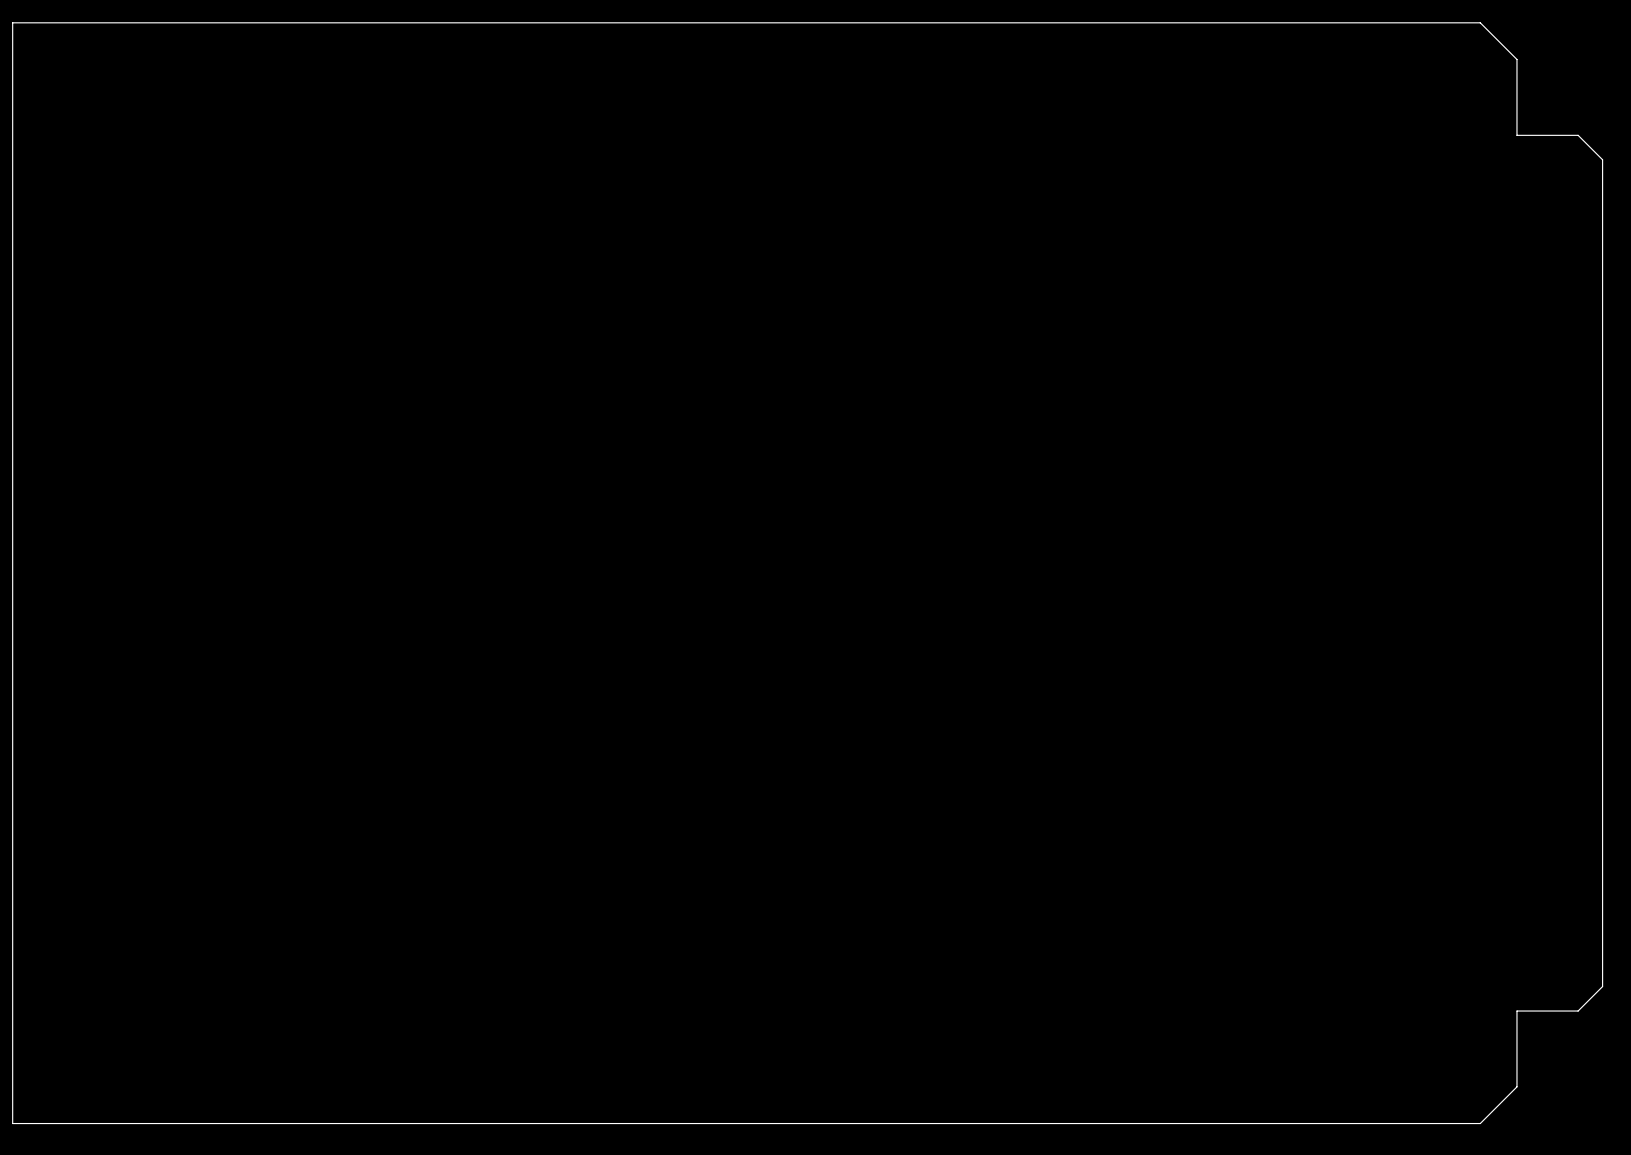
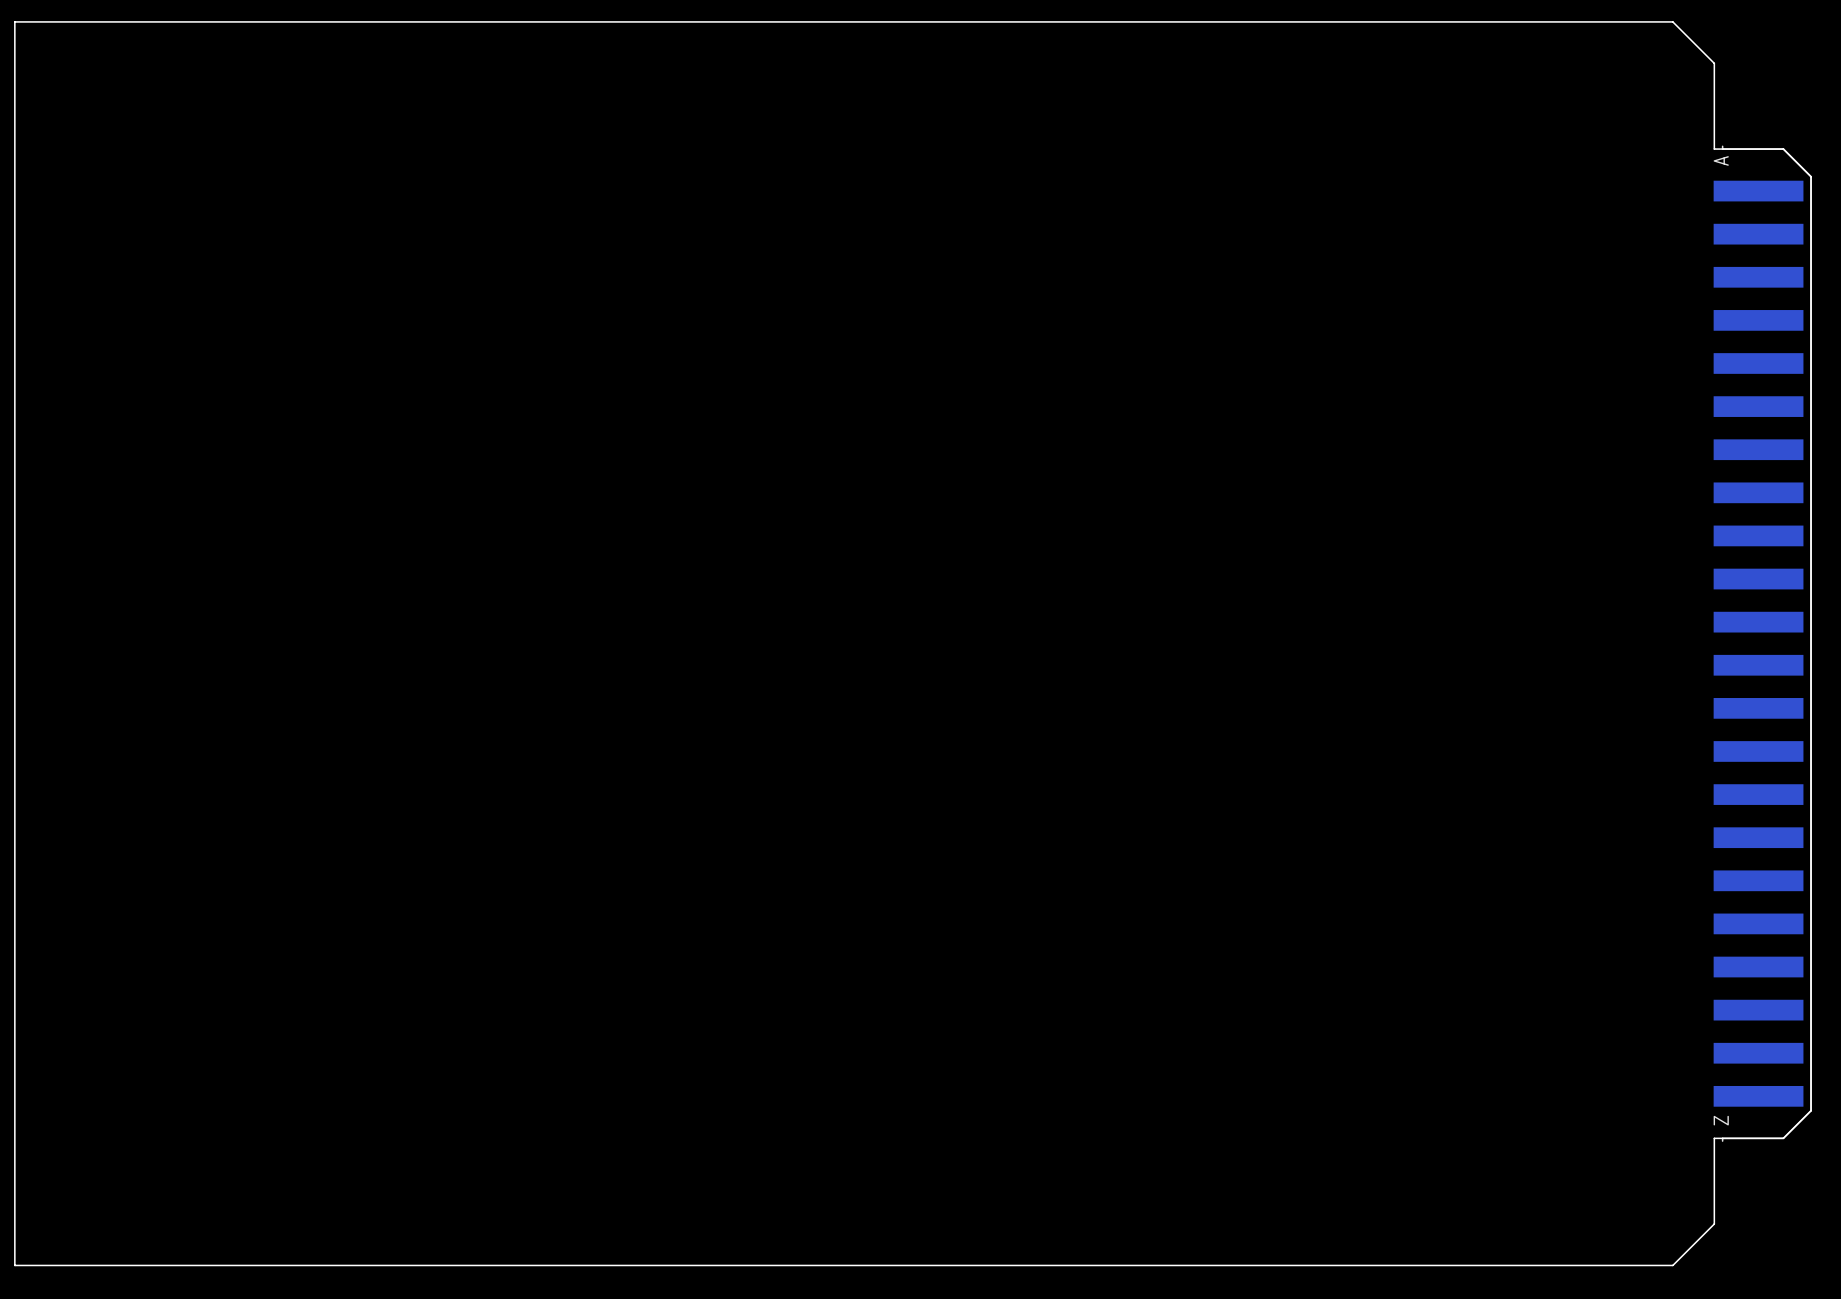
part: none -> (1762, 643)

